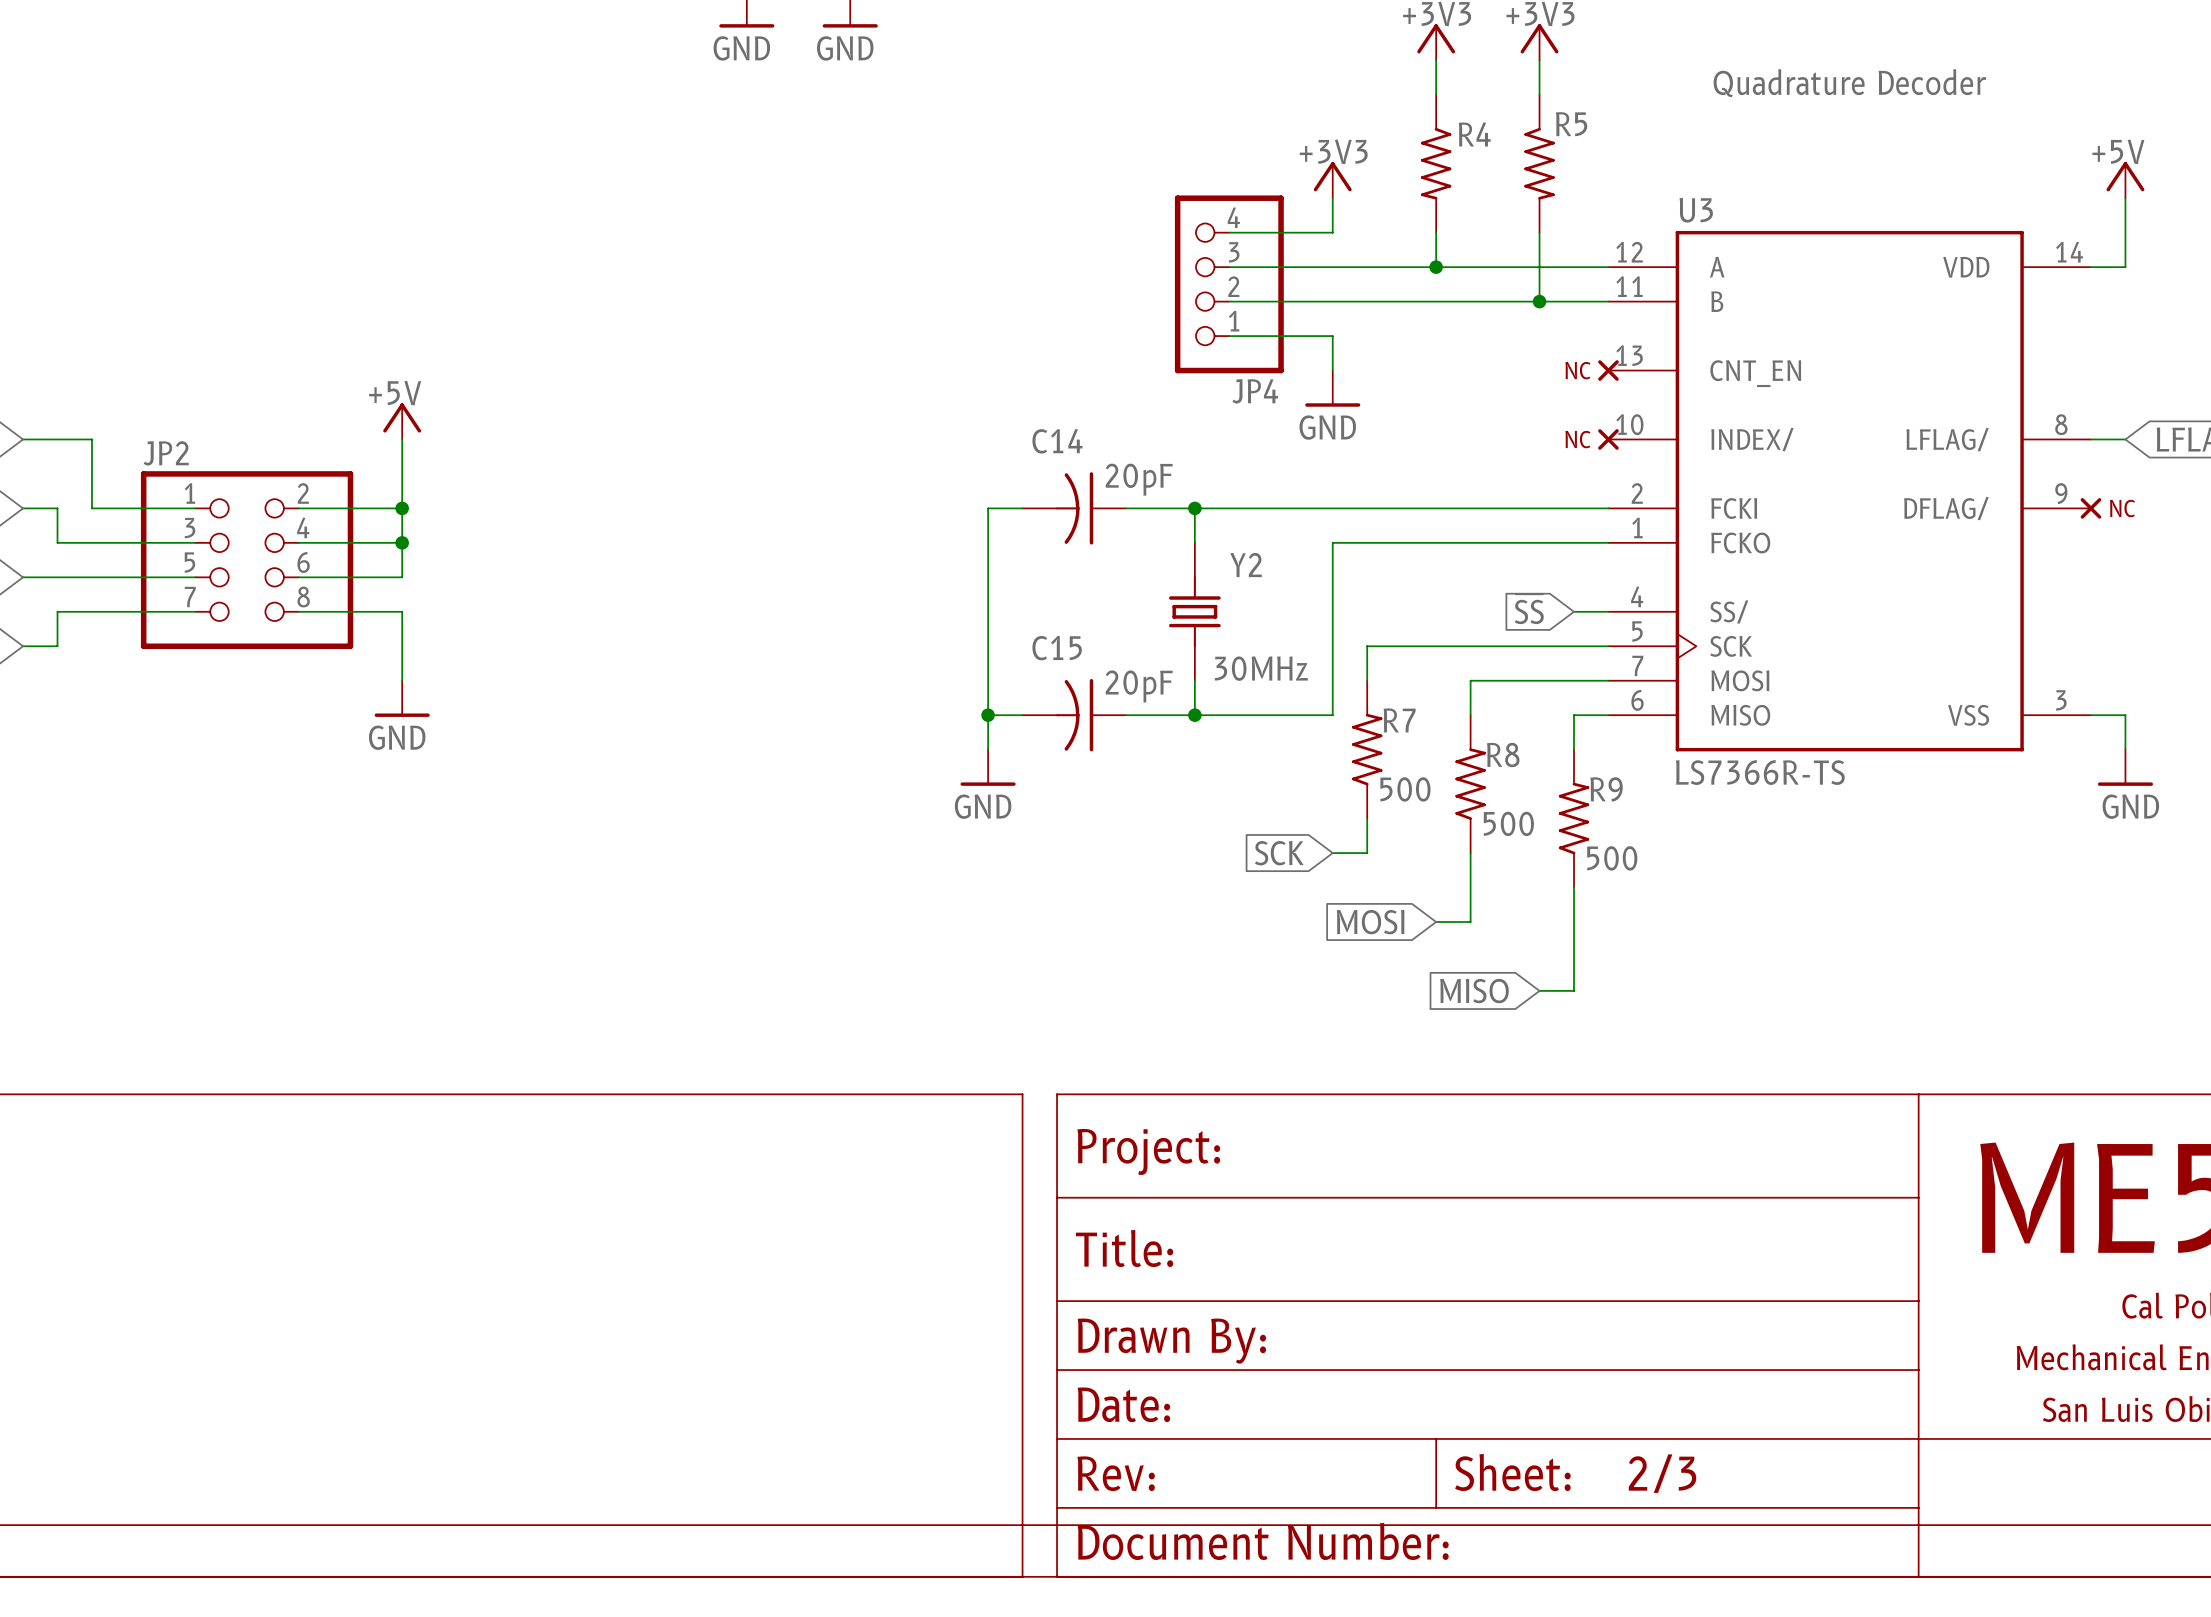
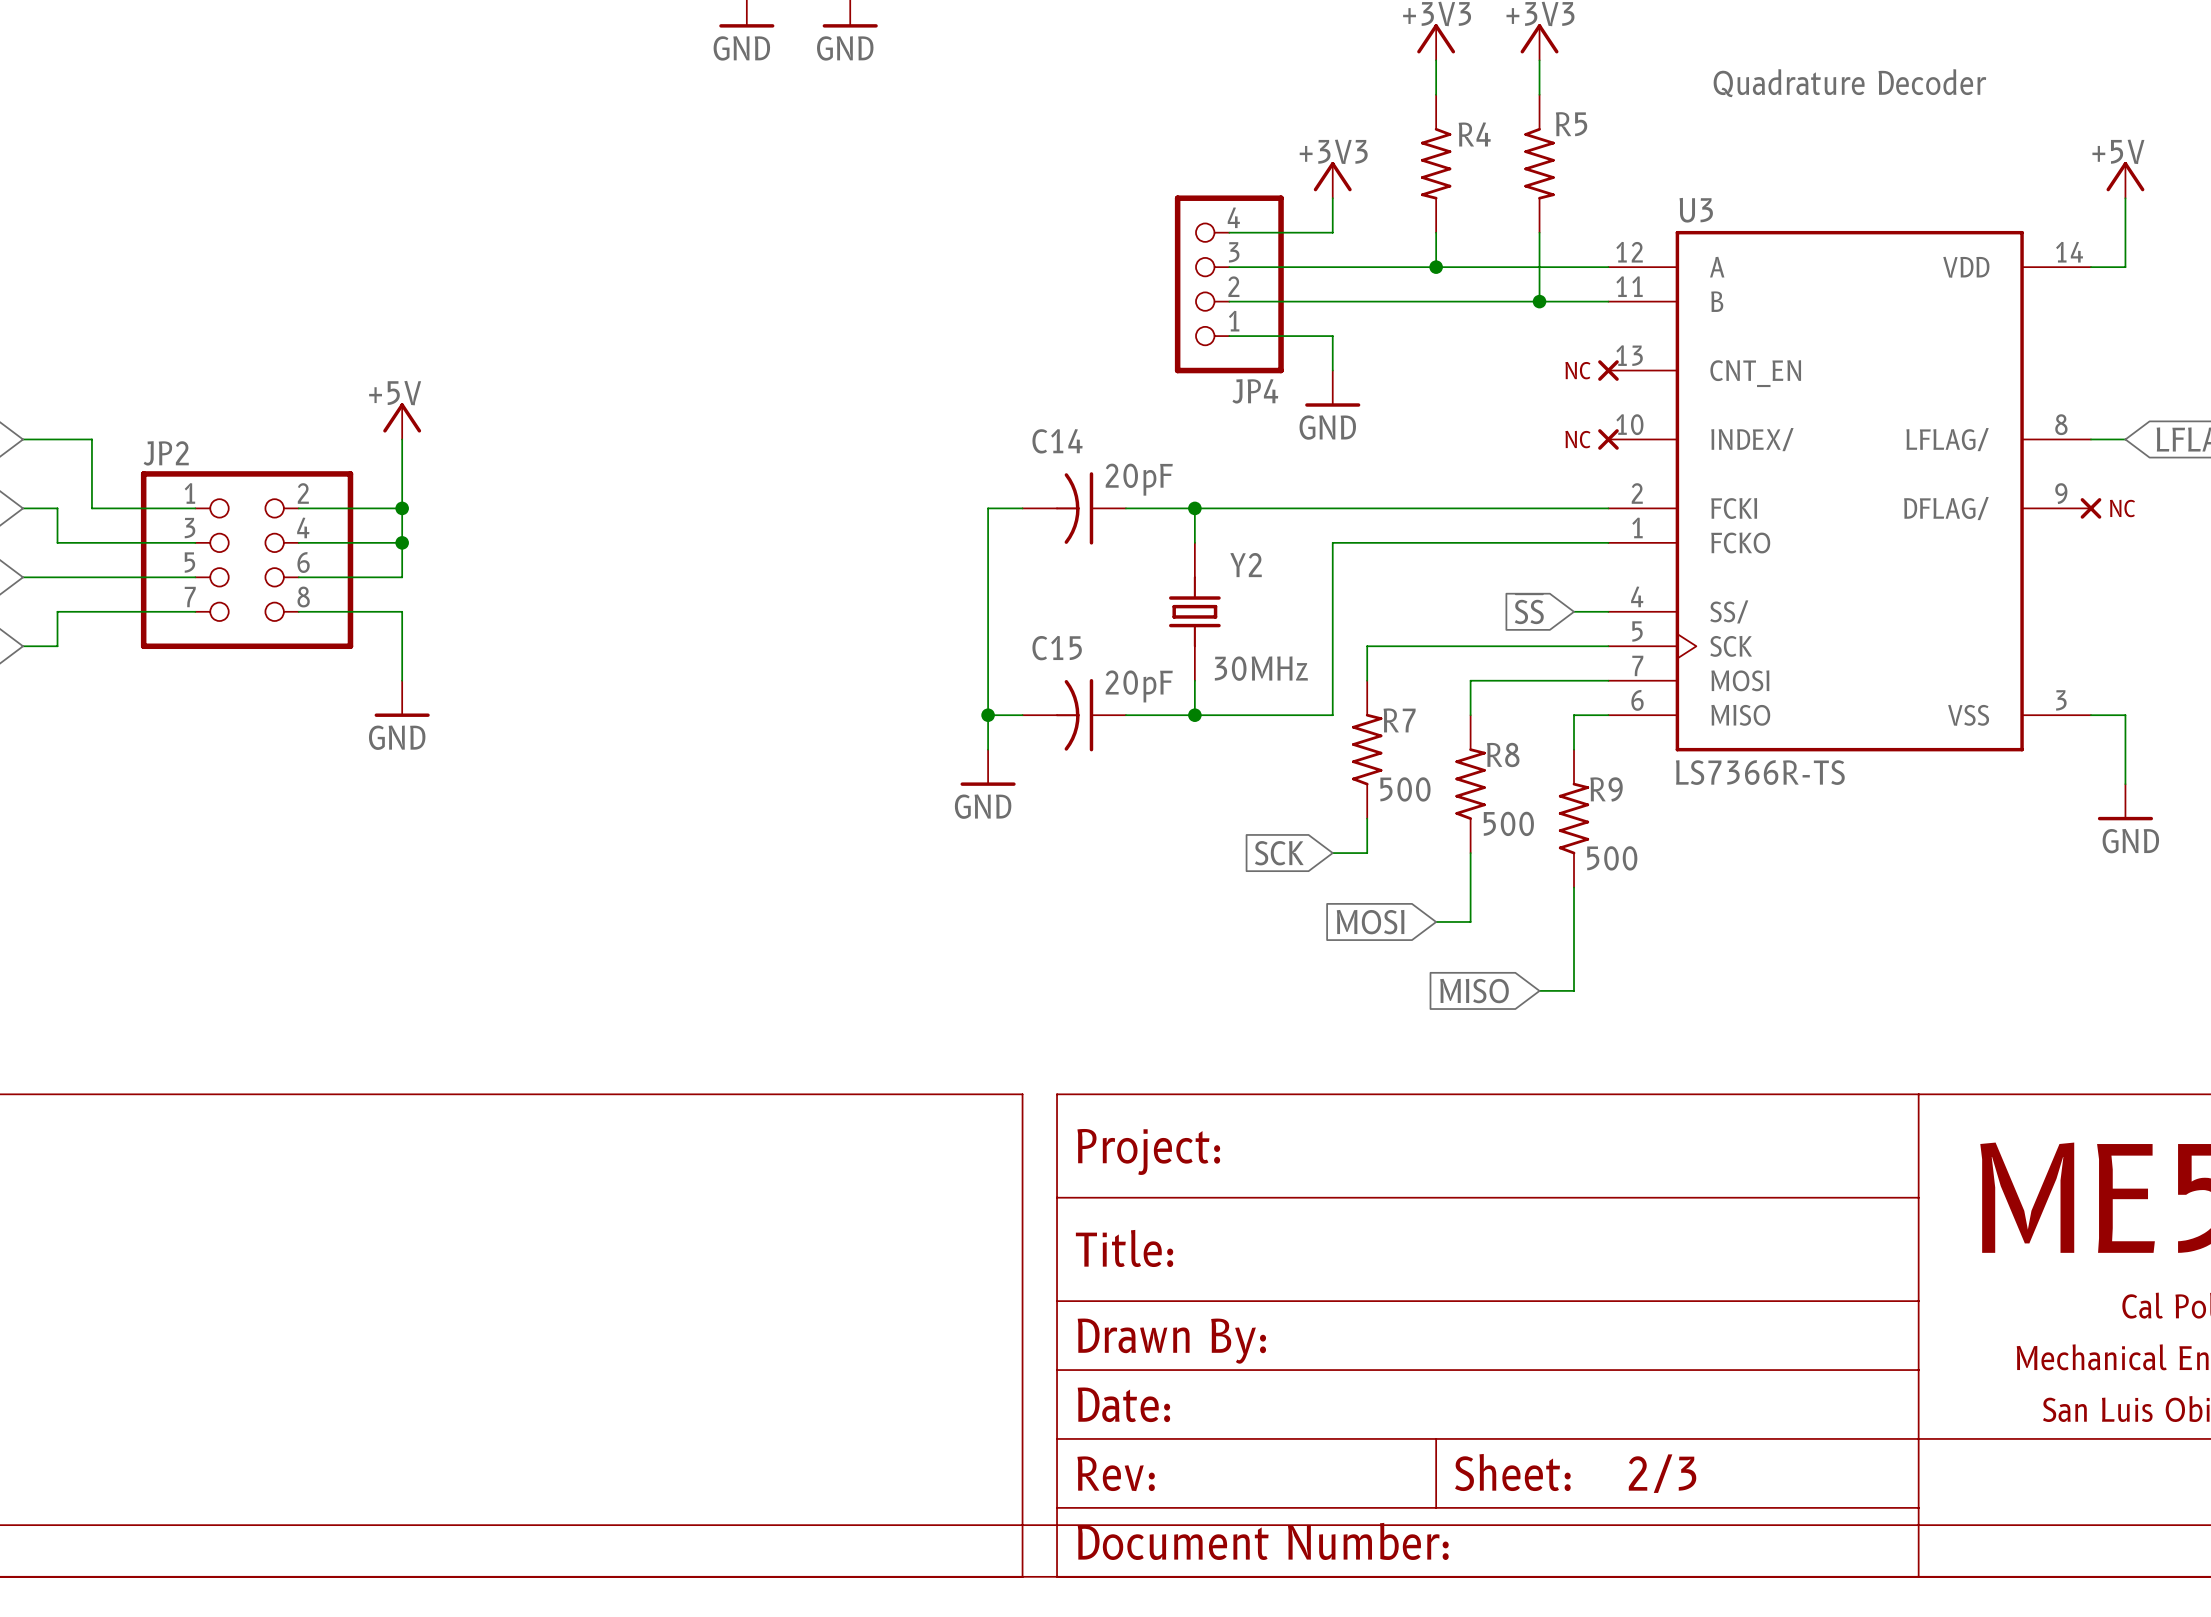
power symbol position: GND (2125, 767) -> GND (2125, 802)

